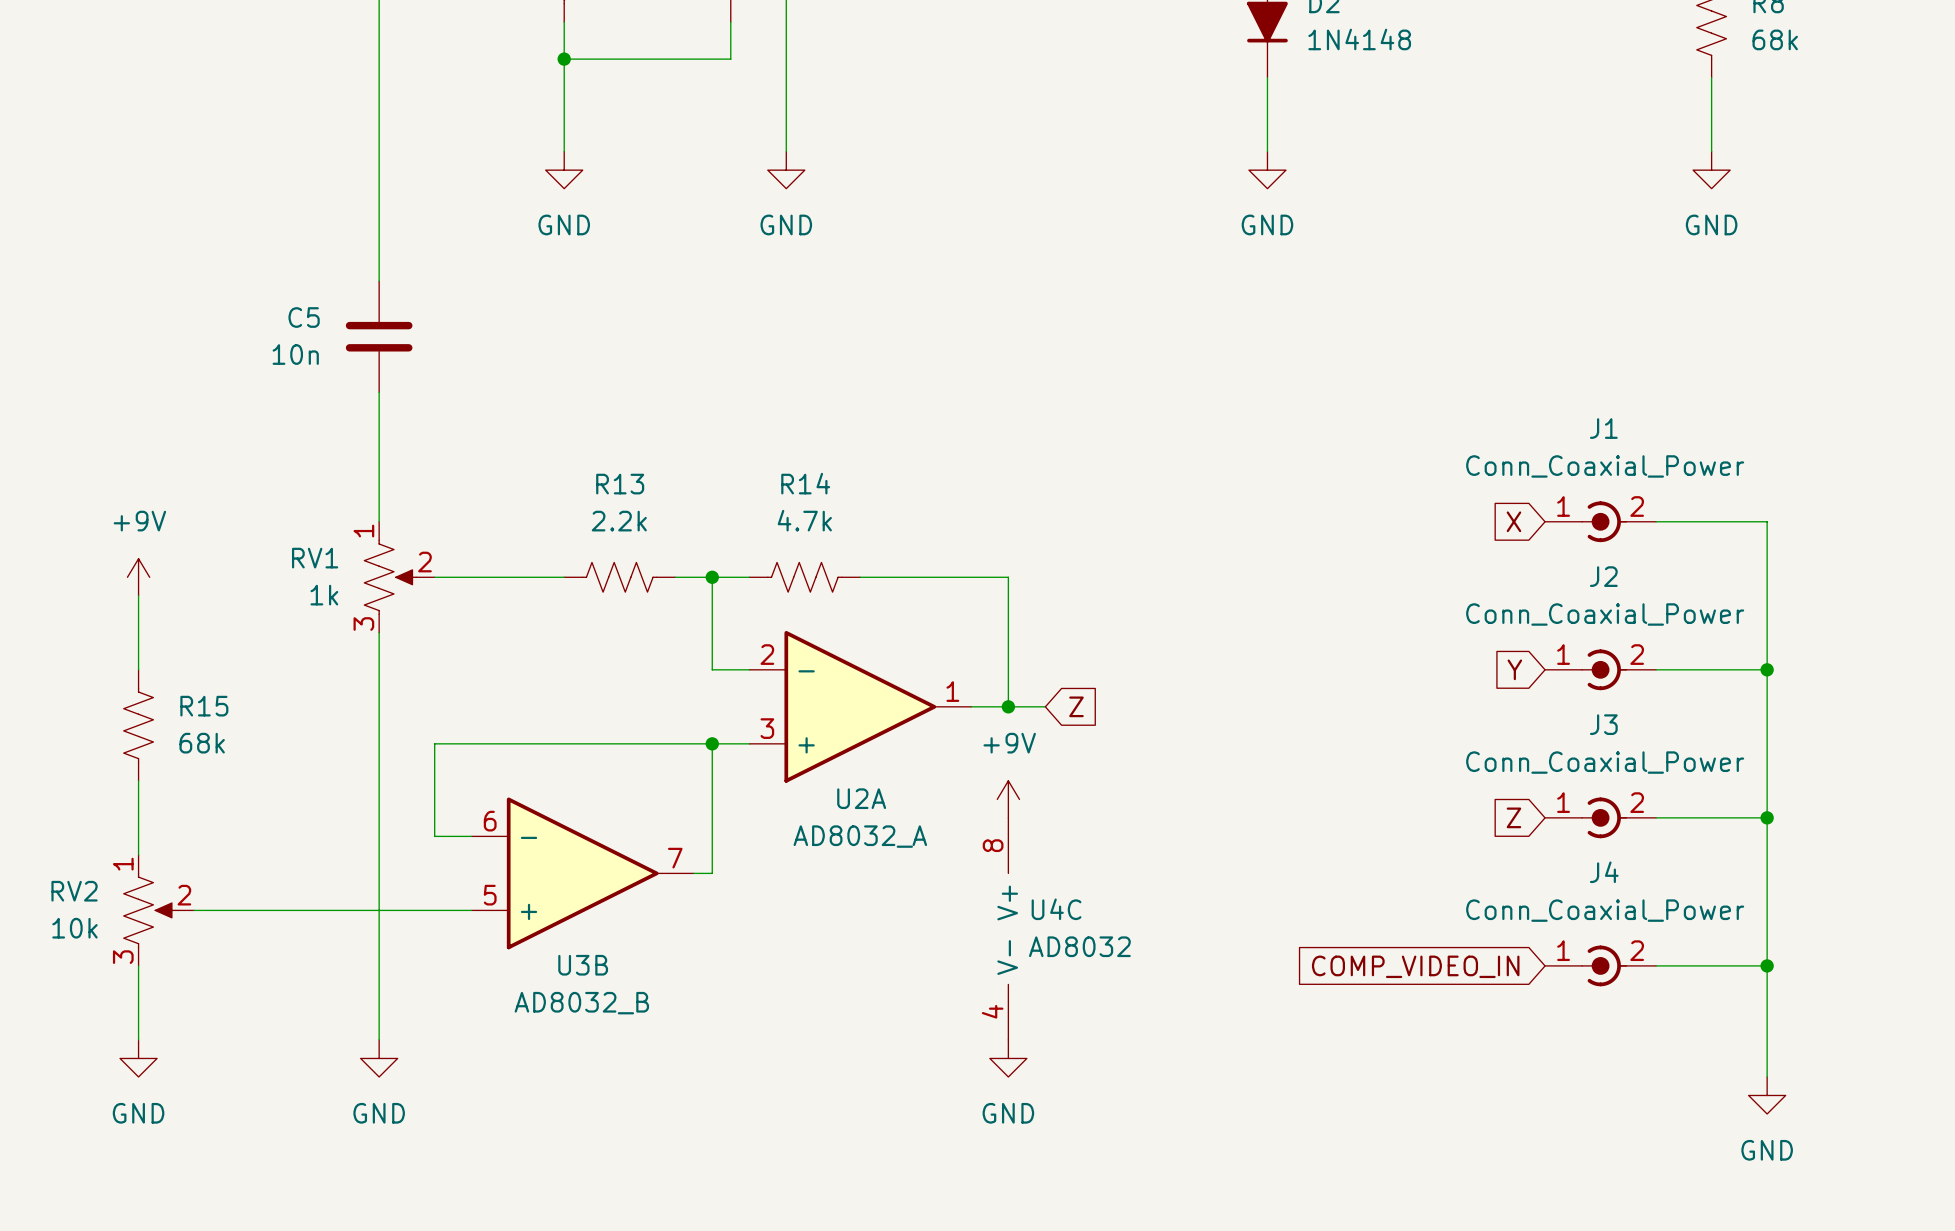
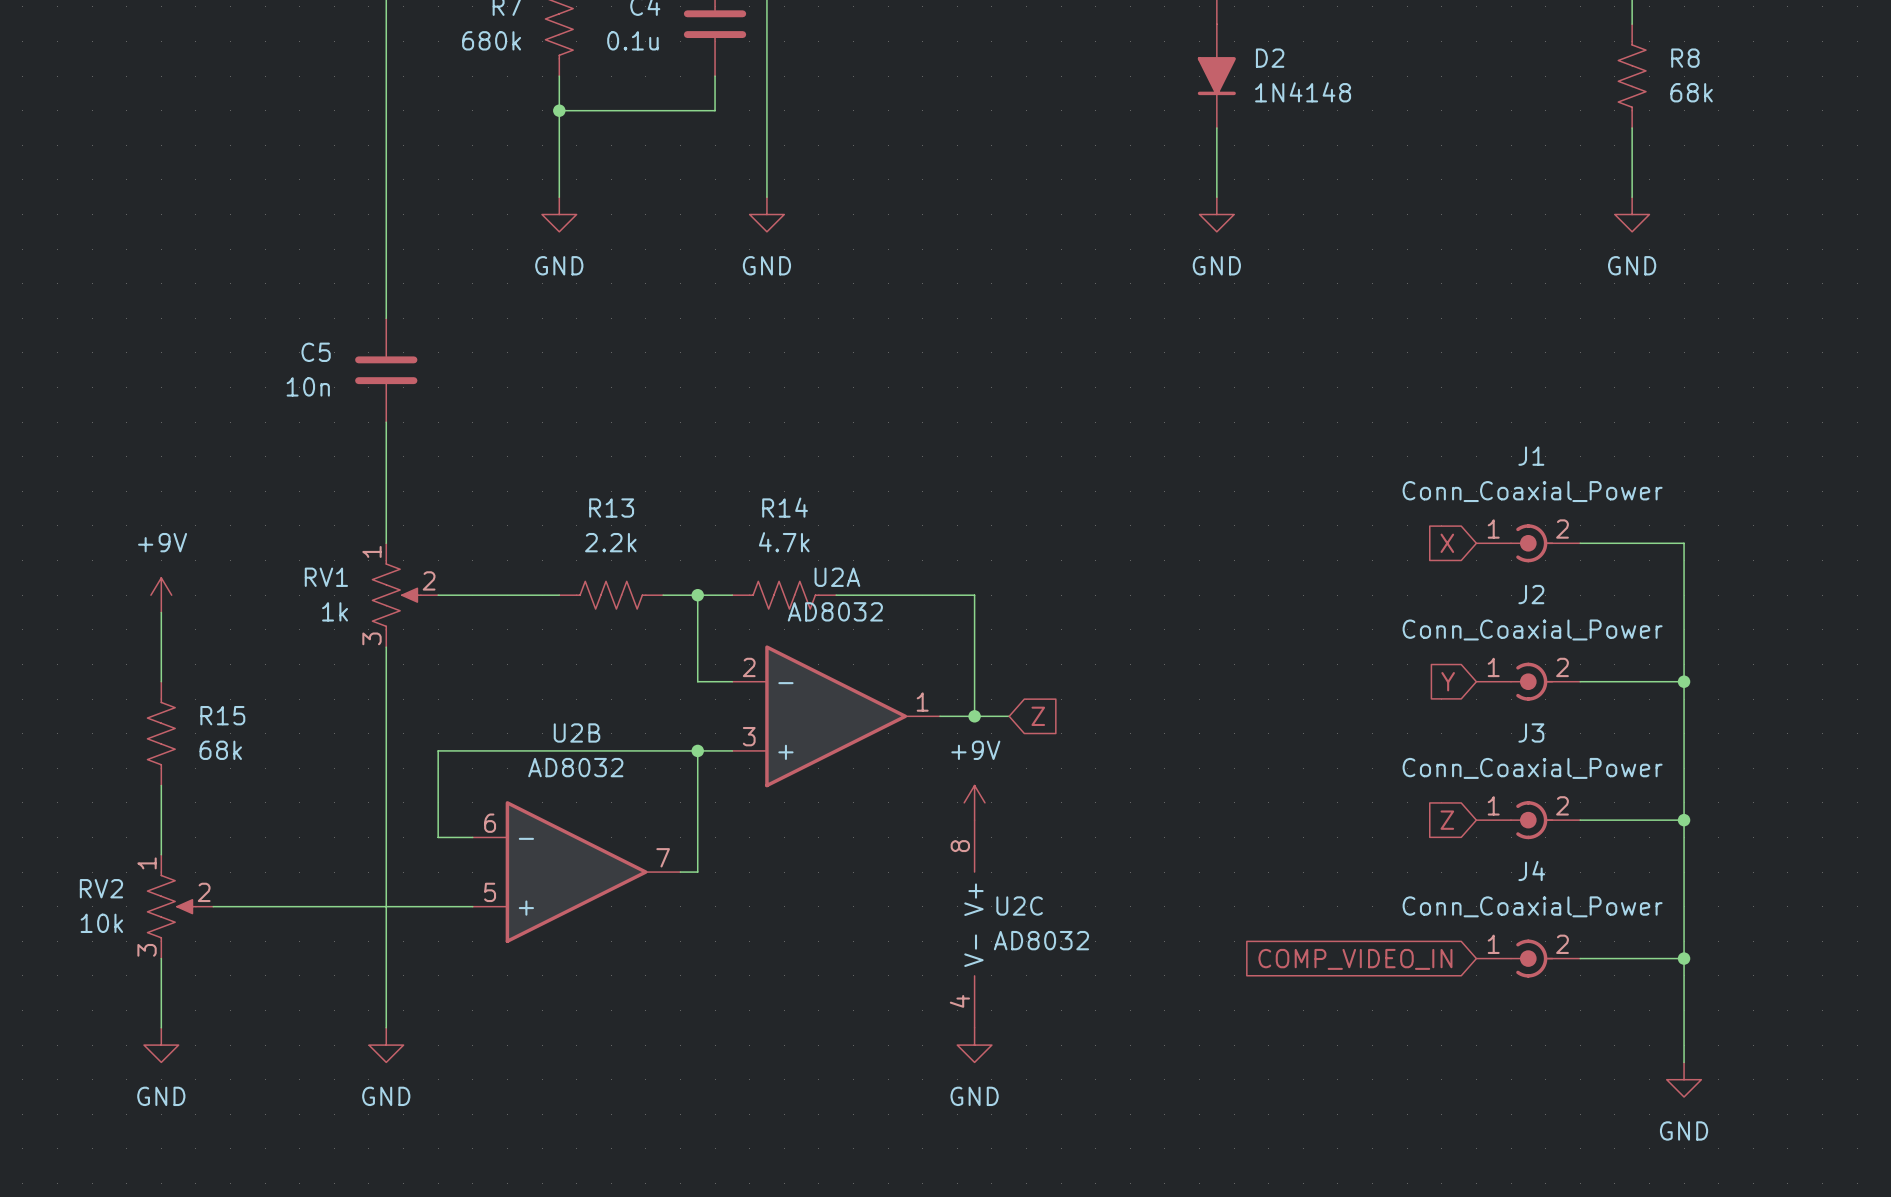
U2A name position: U2A (861, 798) -> U2A (837, 577)
U2A value: AD8032_A (860, 836) -> AD8032 (835, 611)
U4C name: U4C (1056, 909) -> U2C (1019, 906)
U3B name: U3B (583, 965) -> U2B (577, 732)
U3B value: AD8032_B (581, 1003) -> AD8032 (575, 767)

